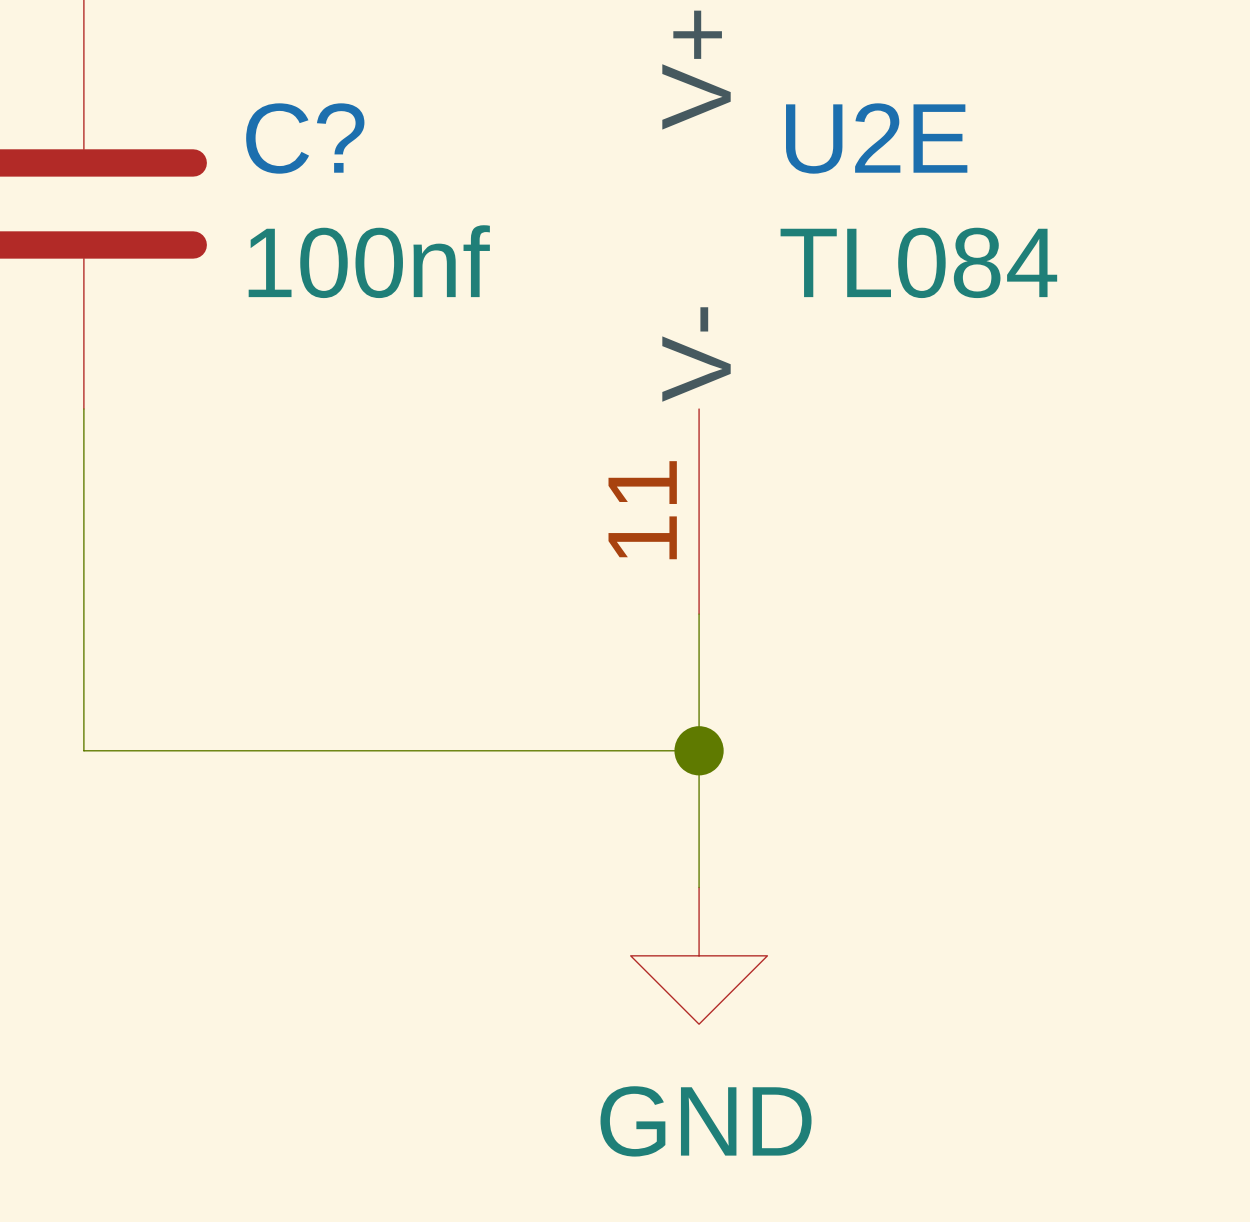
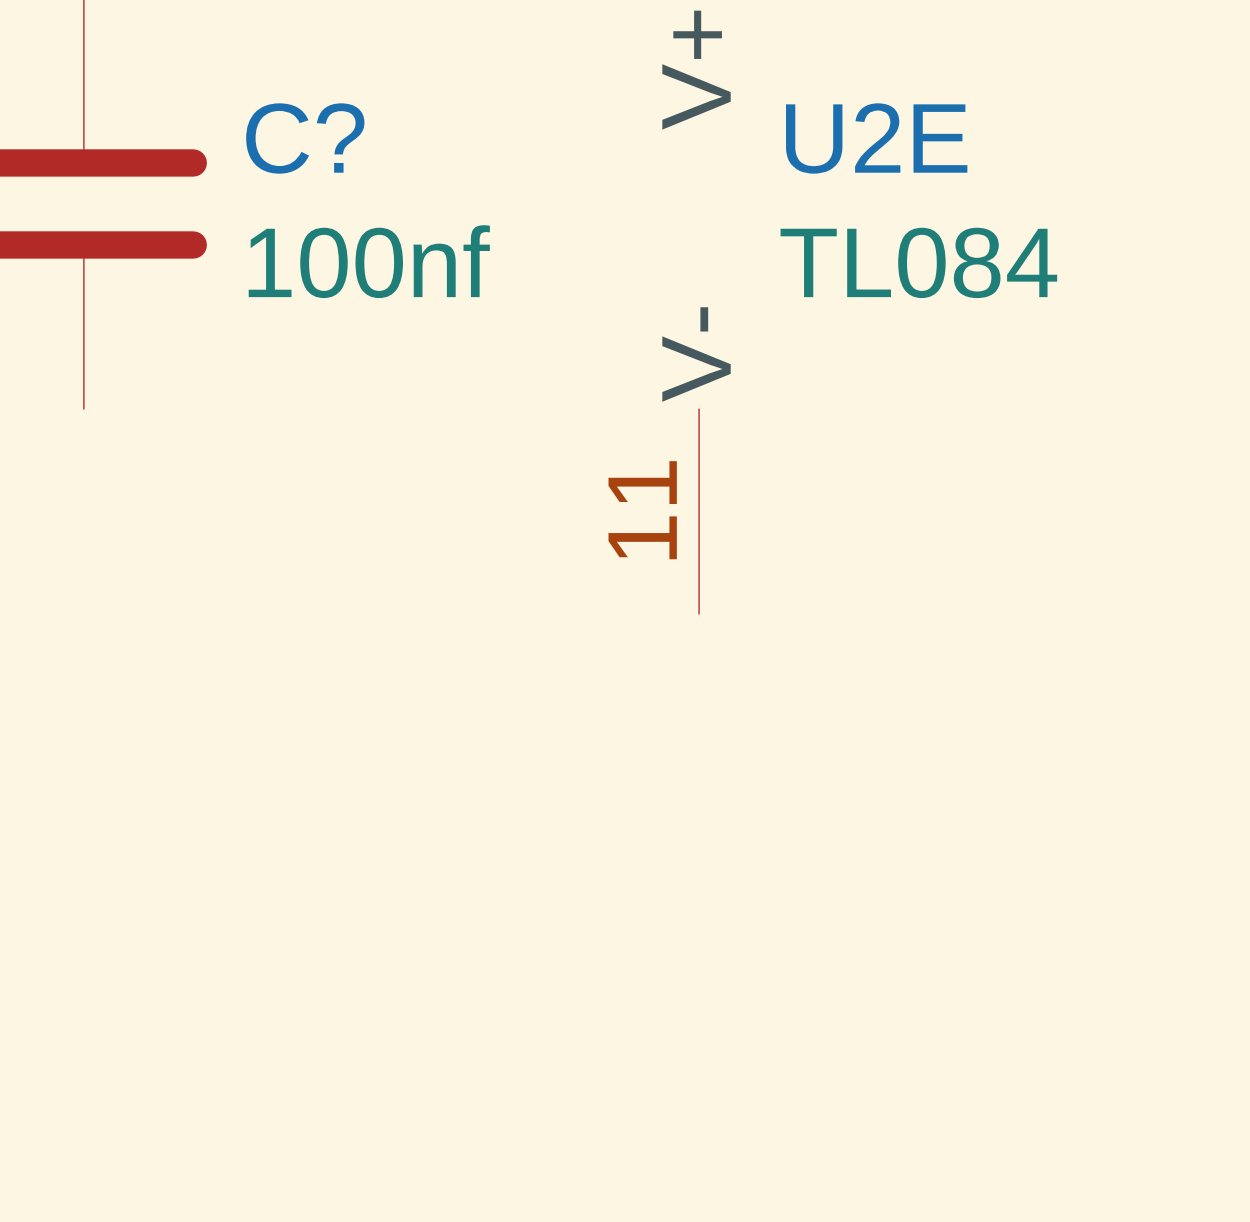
wire: (83, 409) (83, 750) (699, 750) -> none
wire: (699, 614) (699, 887) -> none
junction: (699, 750) -> none
power symbol: GND (699, 955) -> none

